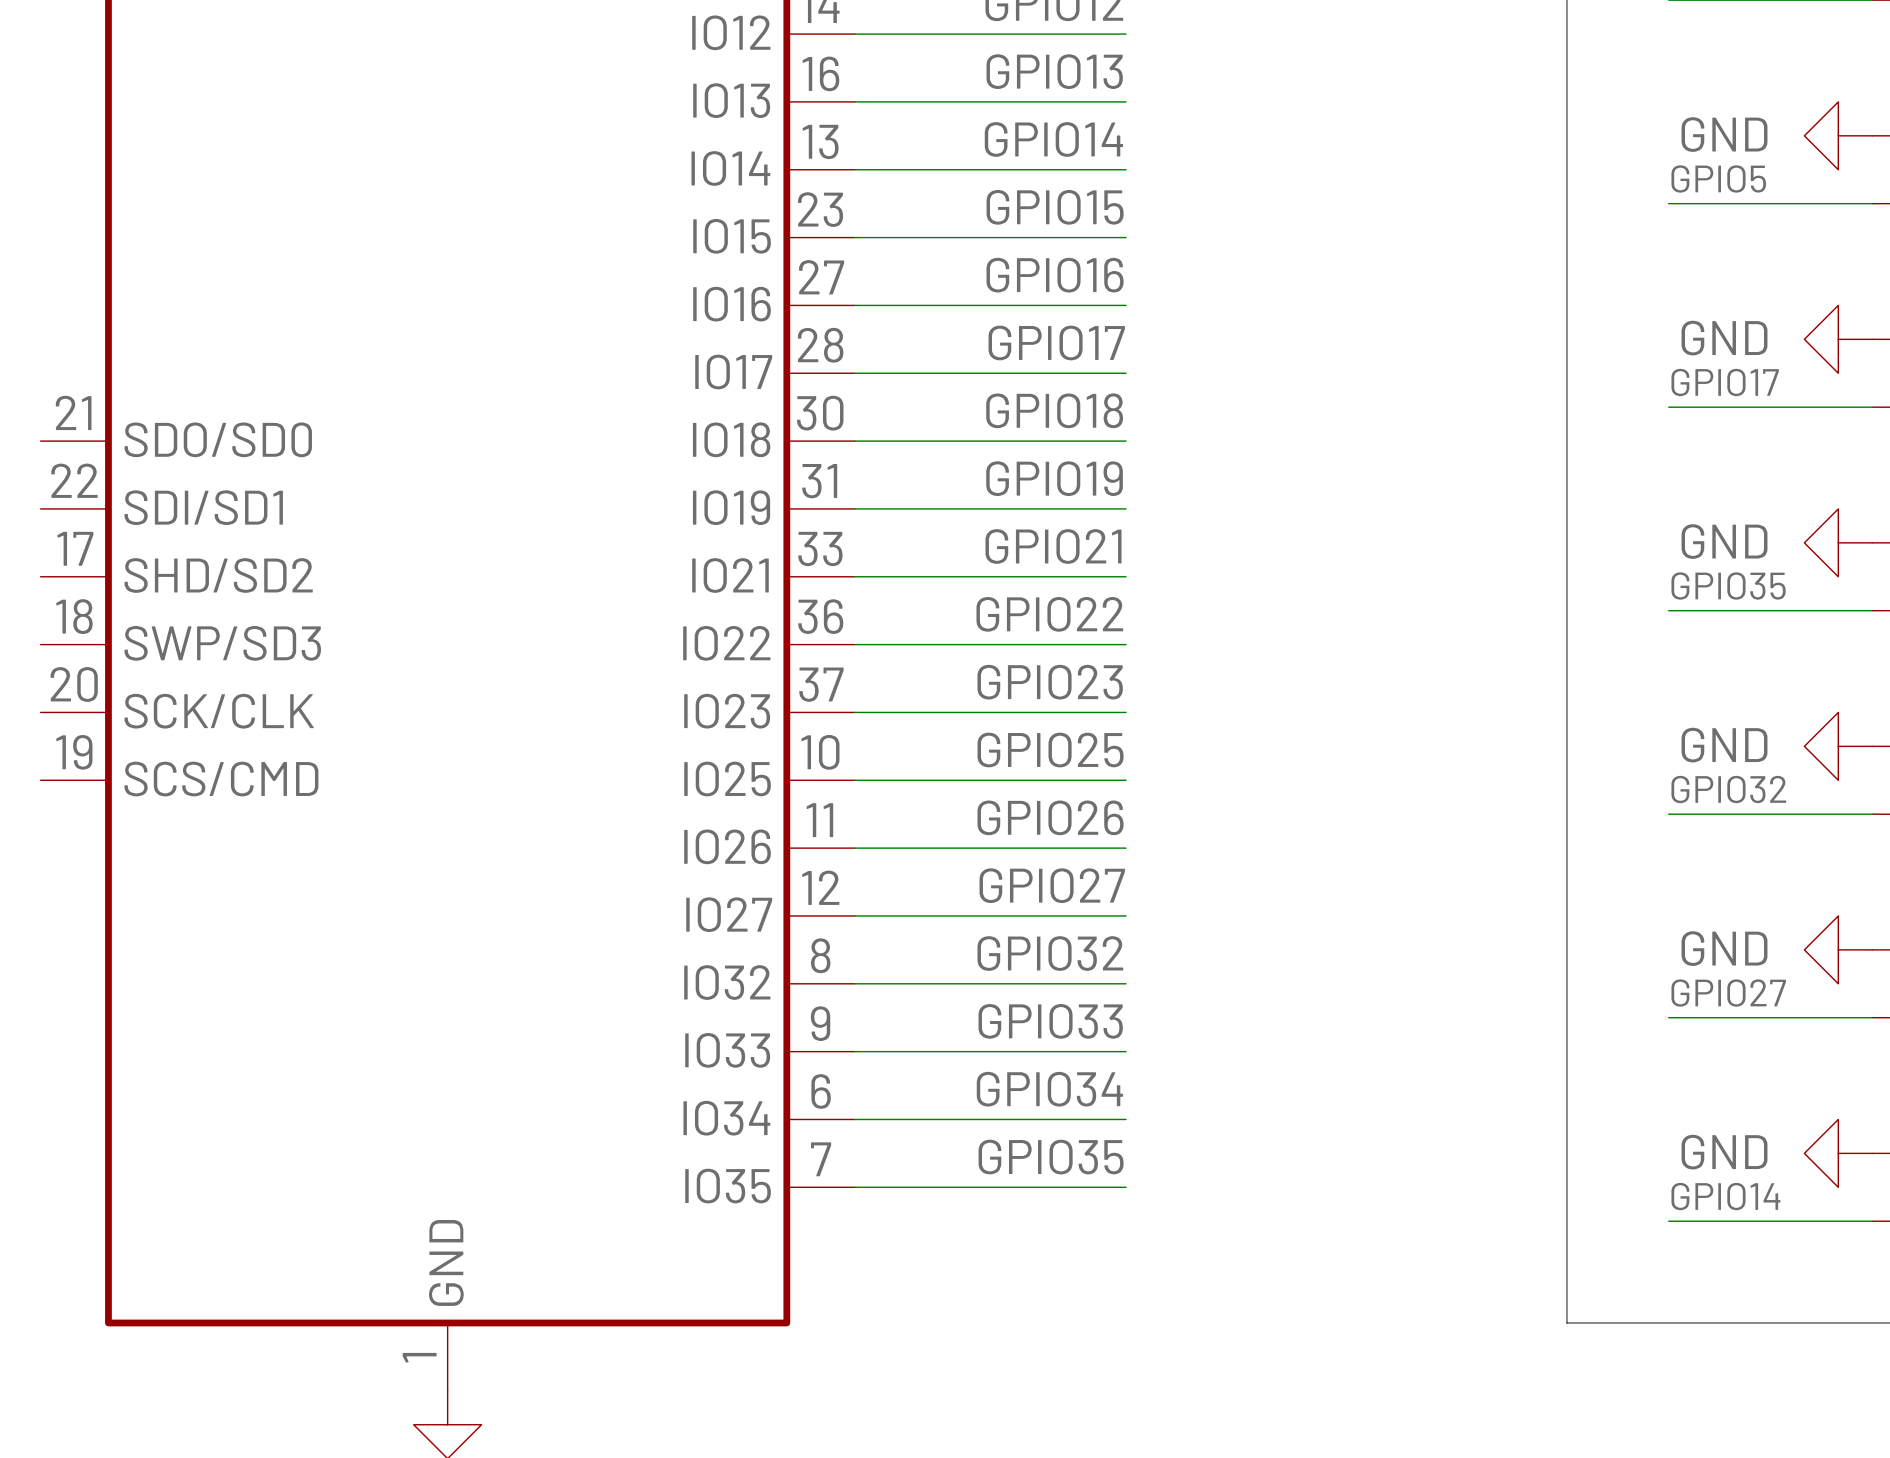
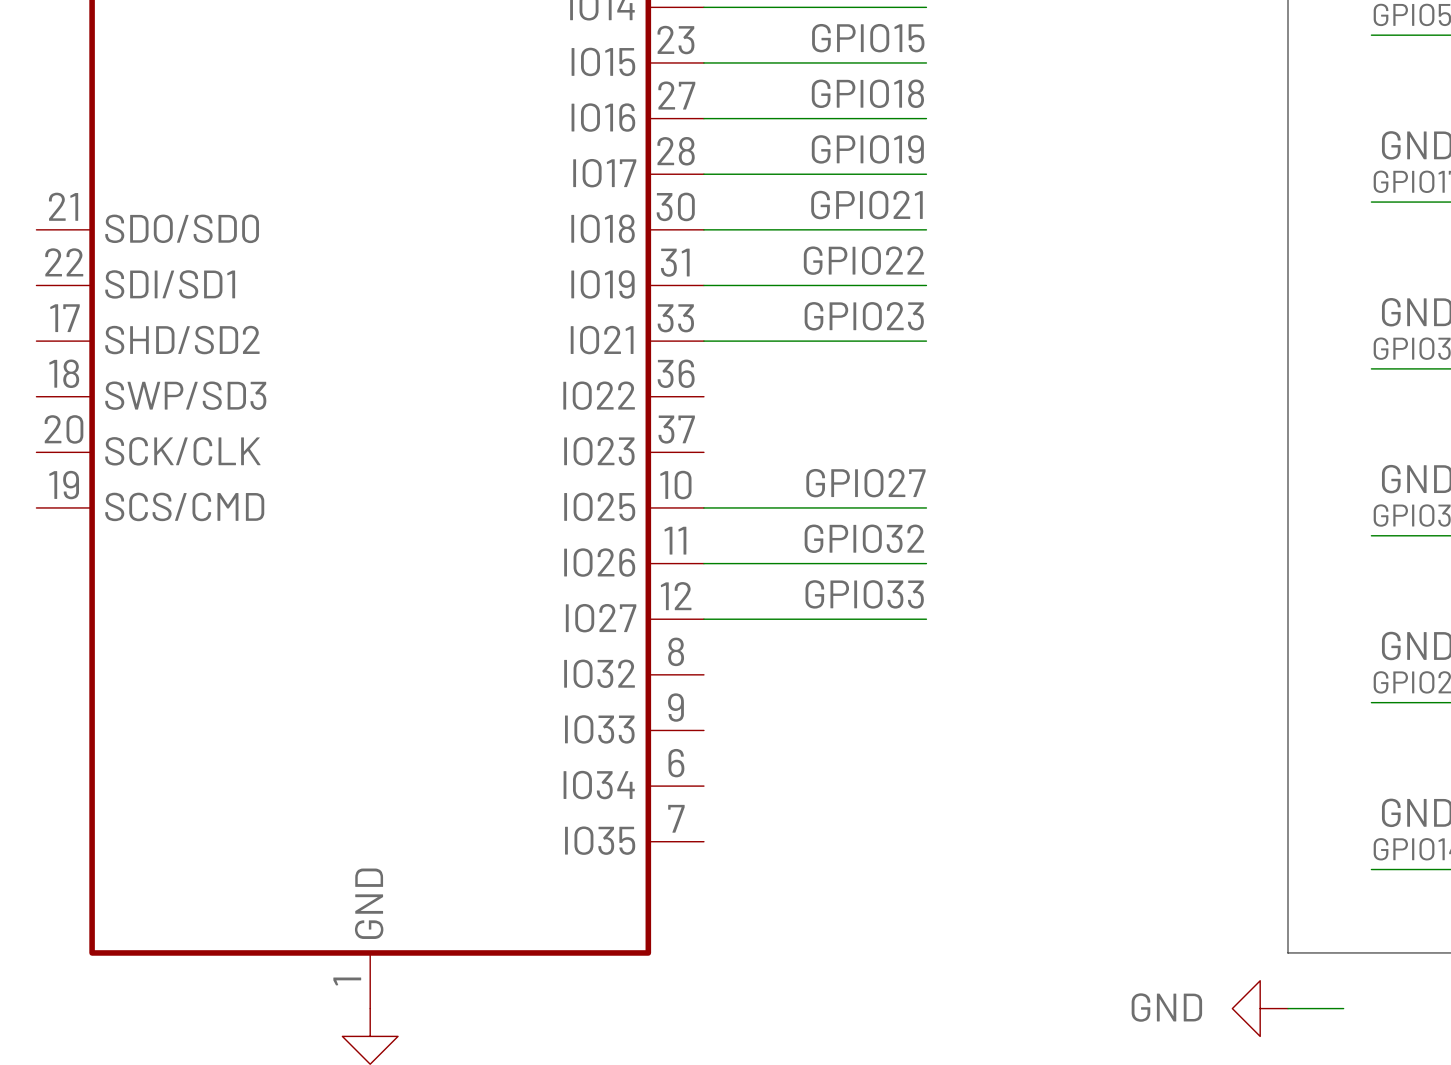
label: GPIO16 (1055, 275) -> GPIO18 (867, 93)
label: GPIO17 (1056, 342) -> GPIO19 (867, 149)
label: GPIO18 (1054, 410) -> GPIO21 (866, 205)
label: GPIO19 (1054, 478) -> GPIO22 (863, 260)
label: GPIO21 (1053, 546) -> GPIO23 (864, 316)
label: GPIO22 (1049, 614) -> none
wire: (854, 644) (1126, 644) -> none
label: GPIO23 (1050, 682) -> none
wire: (854, 712) (1126, 712) -> none
label: GPIO25 (1050, 750) -> GPIO27 (865, 483)
label: GPIO26 (1050, 817) -> GPIO32 (864, 538)
label: GPIO27 (1052, 885) -> GPIO33 (864, 594)
label: GPIO32 (1050, 953) -> none
wire: (854, 983) (1126, 983) -> none
label: GPIO33 (1050, 1021) -> none
wire: (854, 1051) (1126, 1051) -> none
label: GPIO34 (1049, 1089) -> none
wire: (854, 1119) (1126, 1119) -> none
label: GPIO35 (1051, 1157) -> none
wire: (854, 1187) (1126, 1187) -> none
power symbol: none -> GND (1260, 1008)
wire: none -> (1287, 1008) (1343, 1008)

